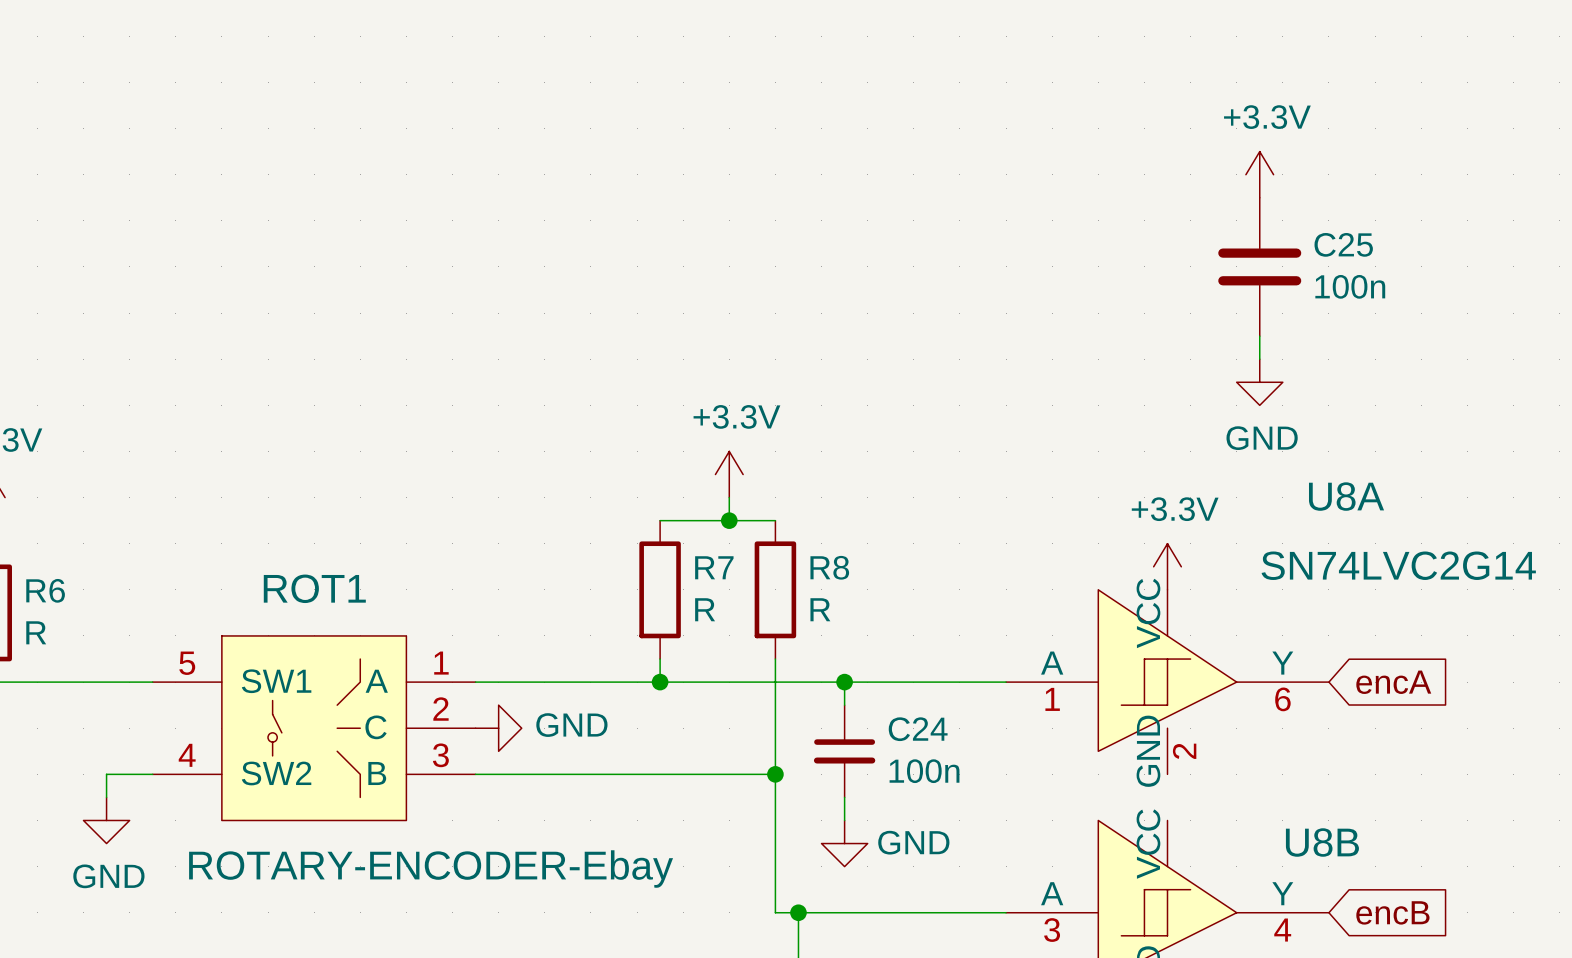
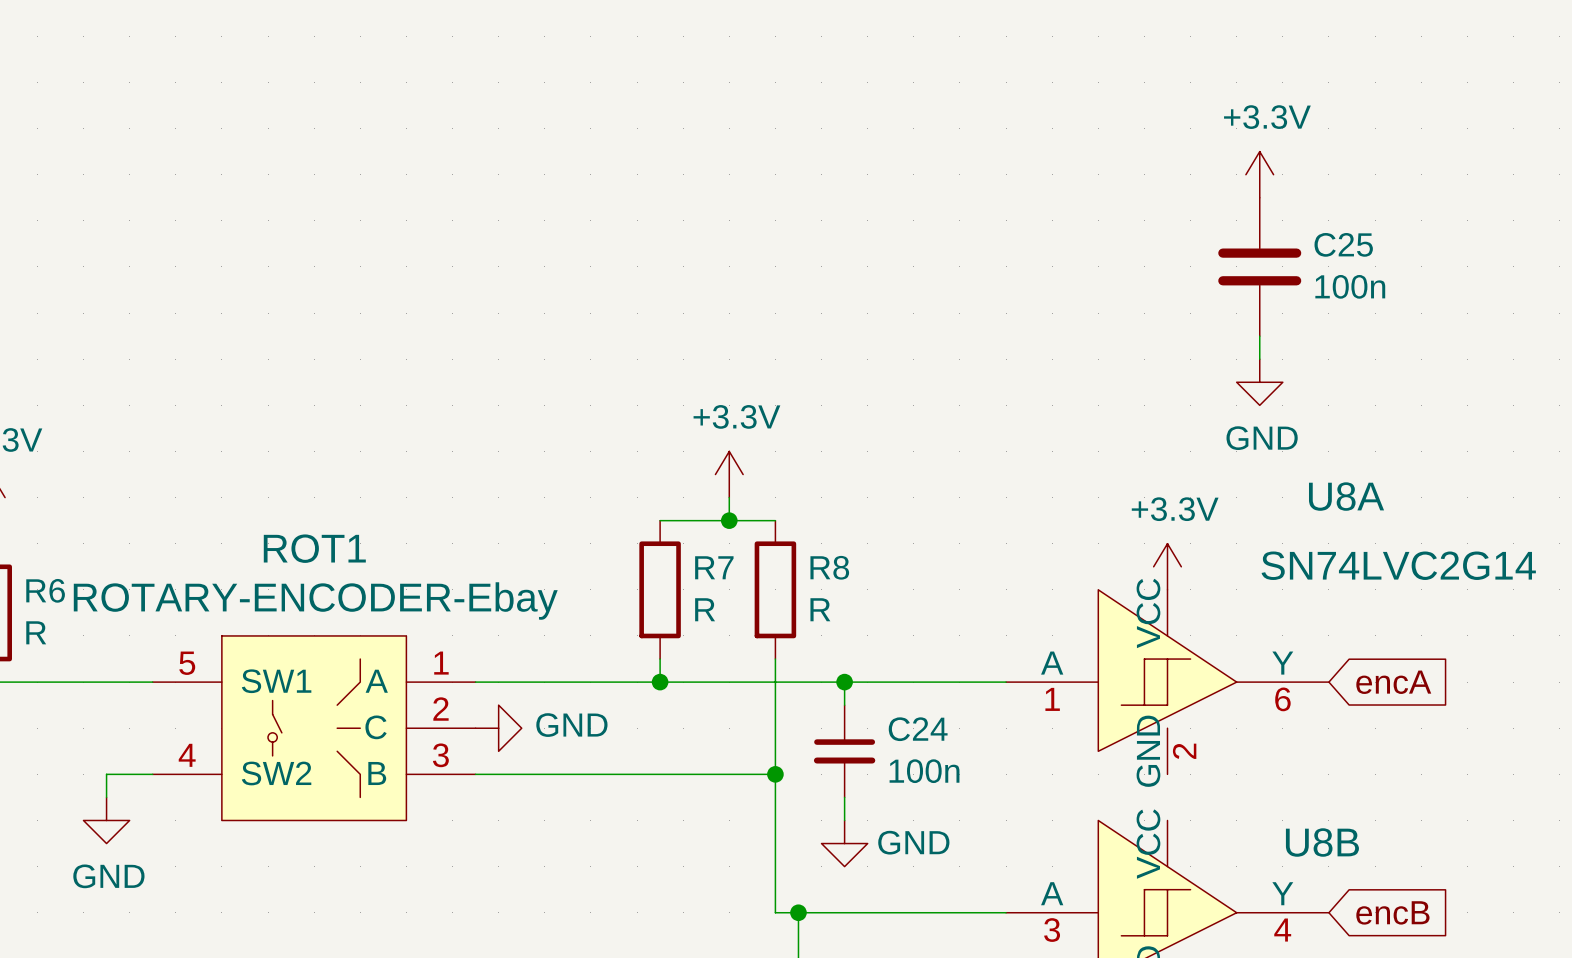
ROT1 name position: ROT1 (314, 588) -> ROT1 (314, 548)
ROT1 value position: ROTARY-ENCODER-Ebay (431, 869) -> ROTARY-ENCODER-Ebay (315, 601)

